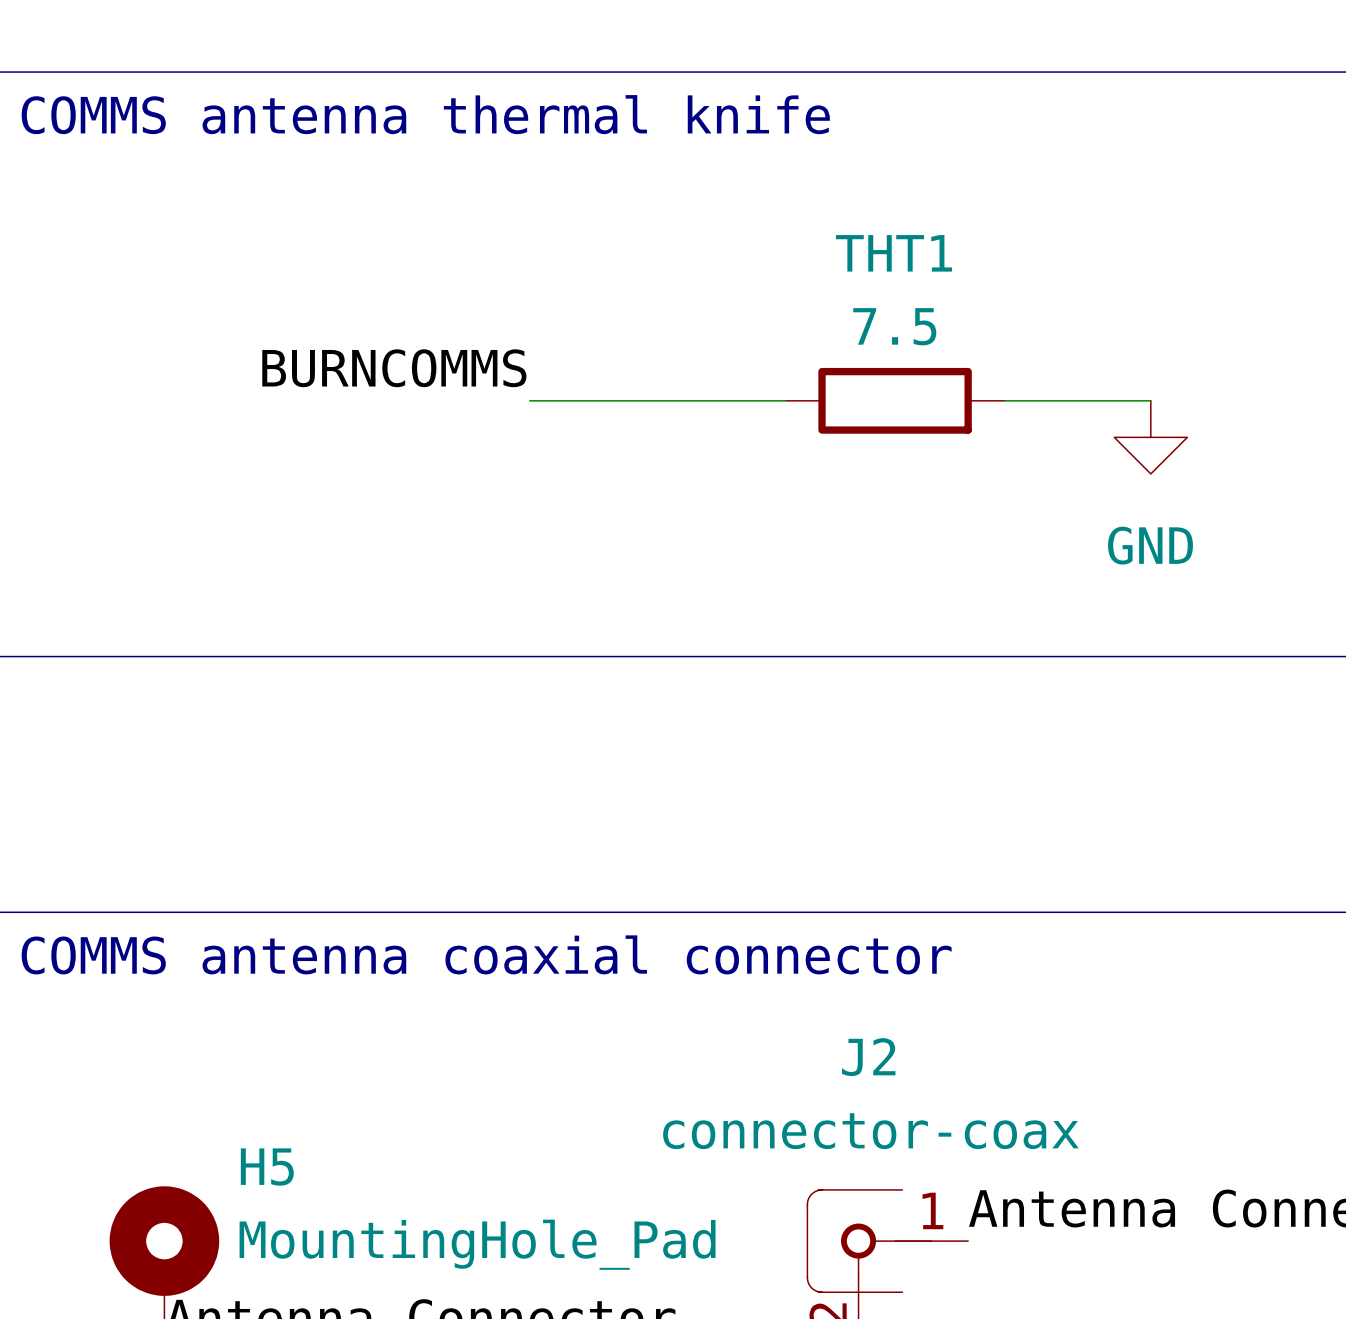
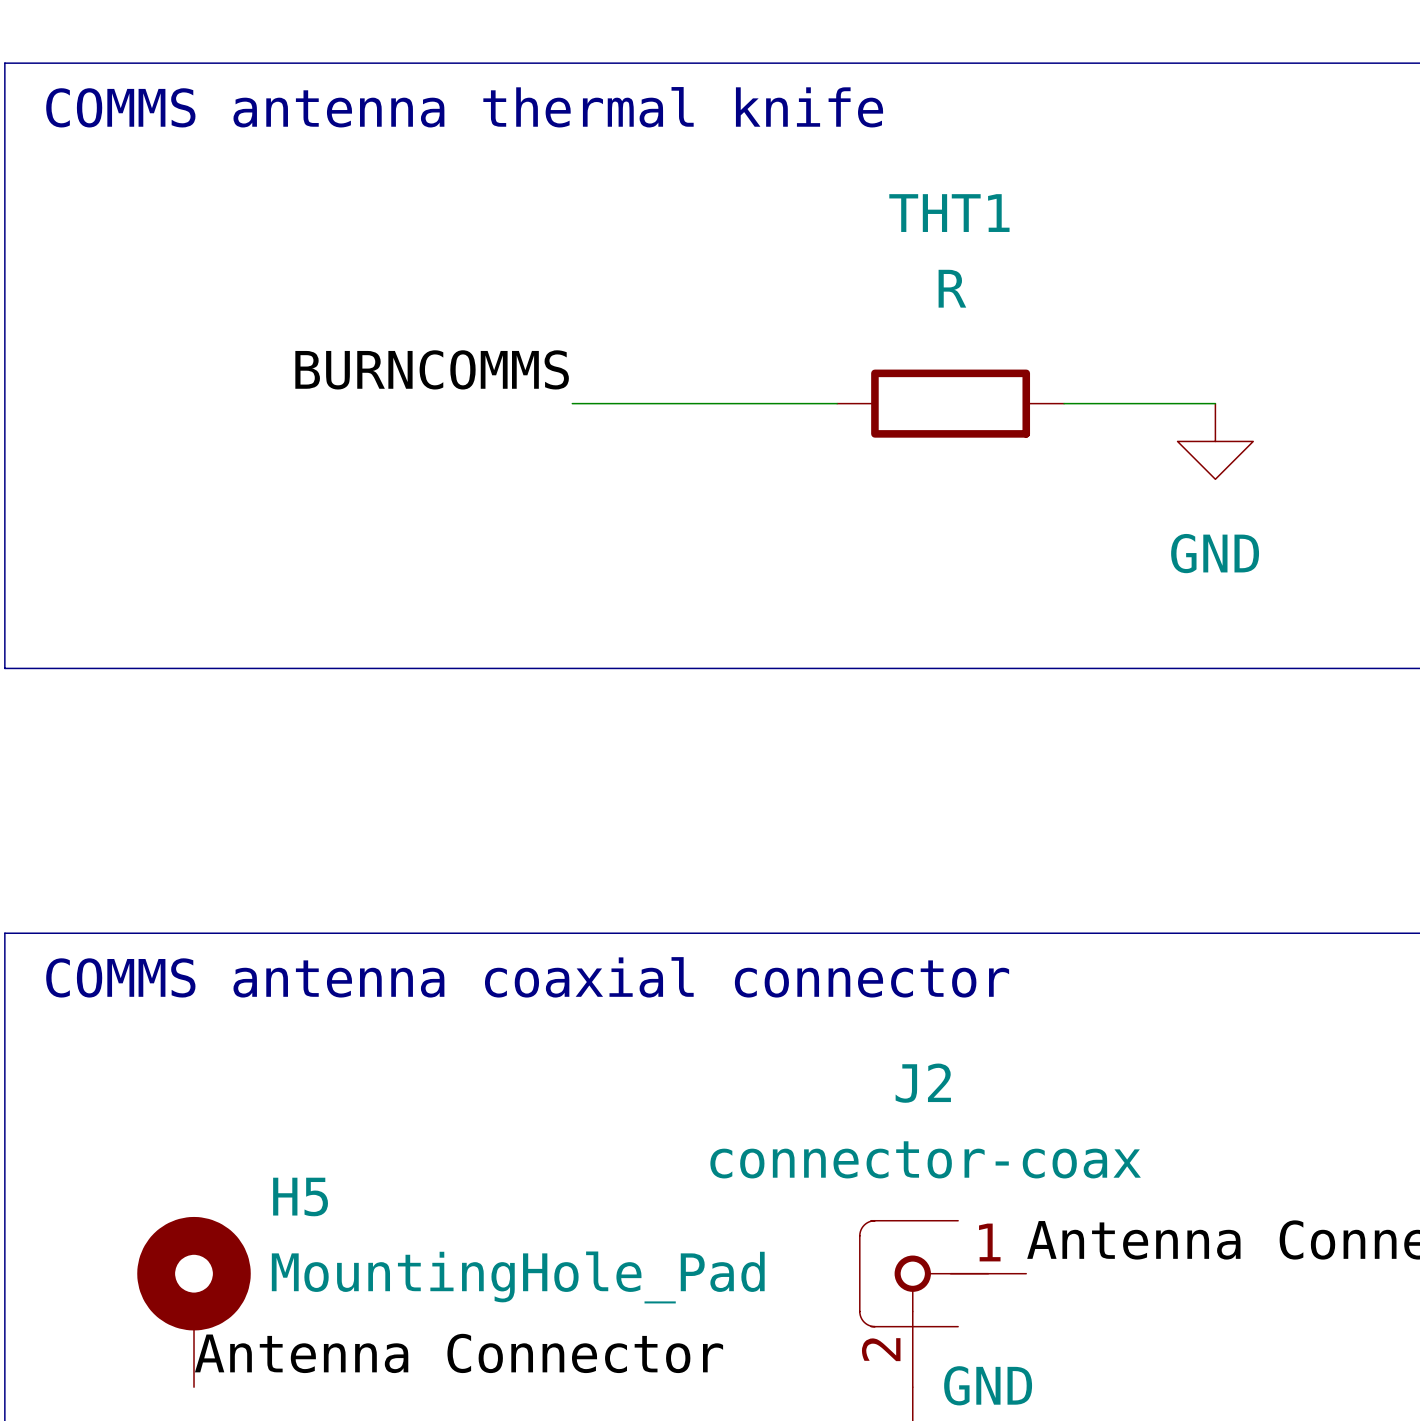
THT1 name position: THT1 (893, 253) -> THT1 (949, 213)
THT1 value: 7.5 (894, 326) -> R (952, 288)

